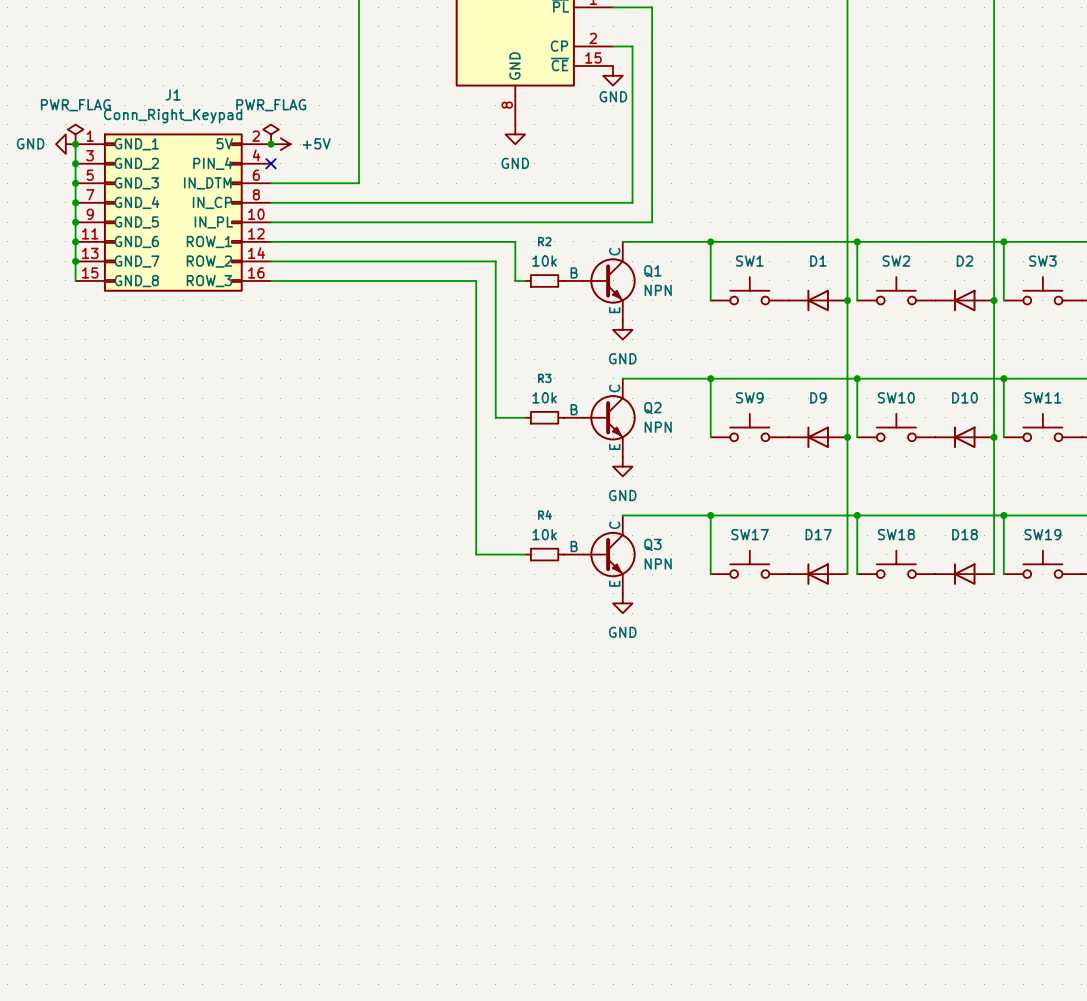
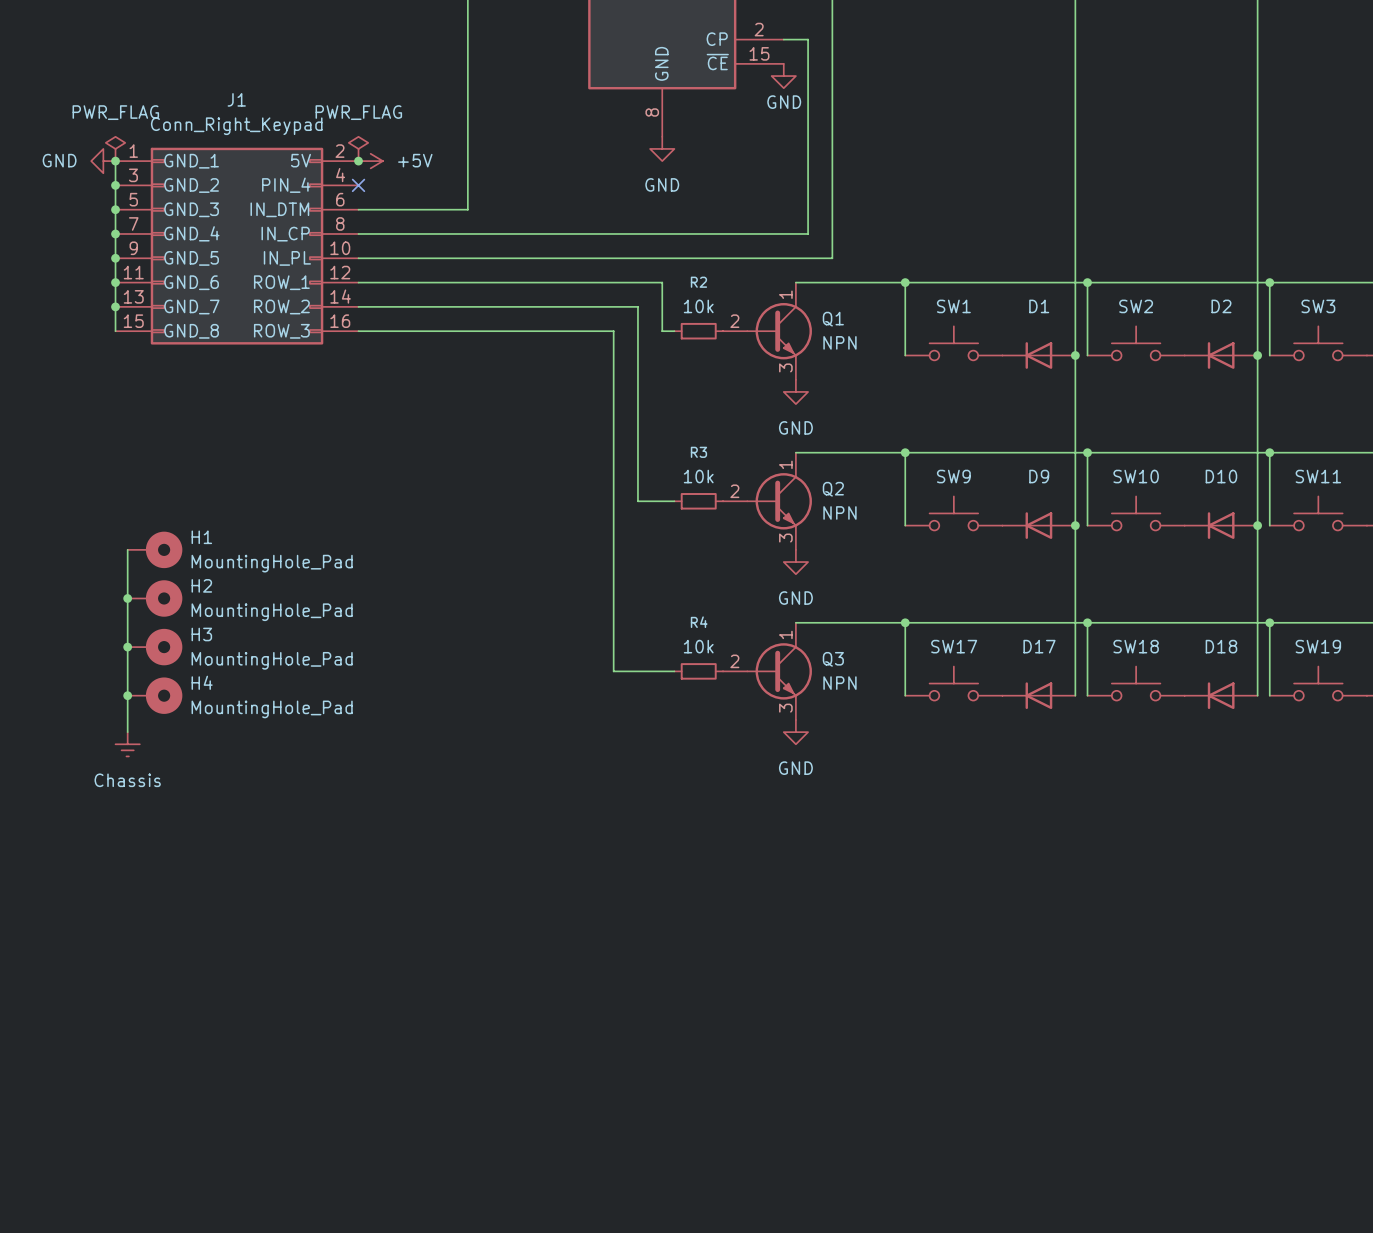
Q1 symbol: [564, 241, 636, 321] -> [723, 282, 812, 380]
Q2 symbol: [564, 378, 636, 457] -> [723, 452, 812, 550]
wire: none -> (127, 549) (127, 732)
H1: none -> MountingHole_Pad (155, 549)
junction: none -> (127, 598)
H2: none -> MountingHole_Pad (155, 598)
Q3 symbol: [564, 515, 636, 594] -> [723, 622, 812, 720]
junction: none -> (127, 647)
H3: none -> MountingHole_Pad (155, 647)
junction: none -> (127, 695)
H4: none -> MountingHole_Pad (155, 695)
power symbol: none -> Chassis (127, 744)

